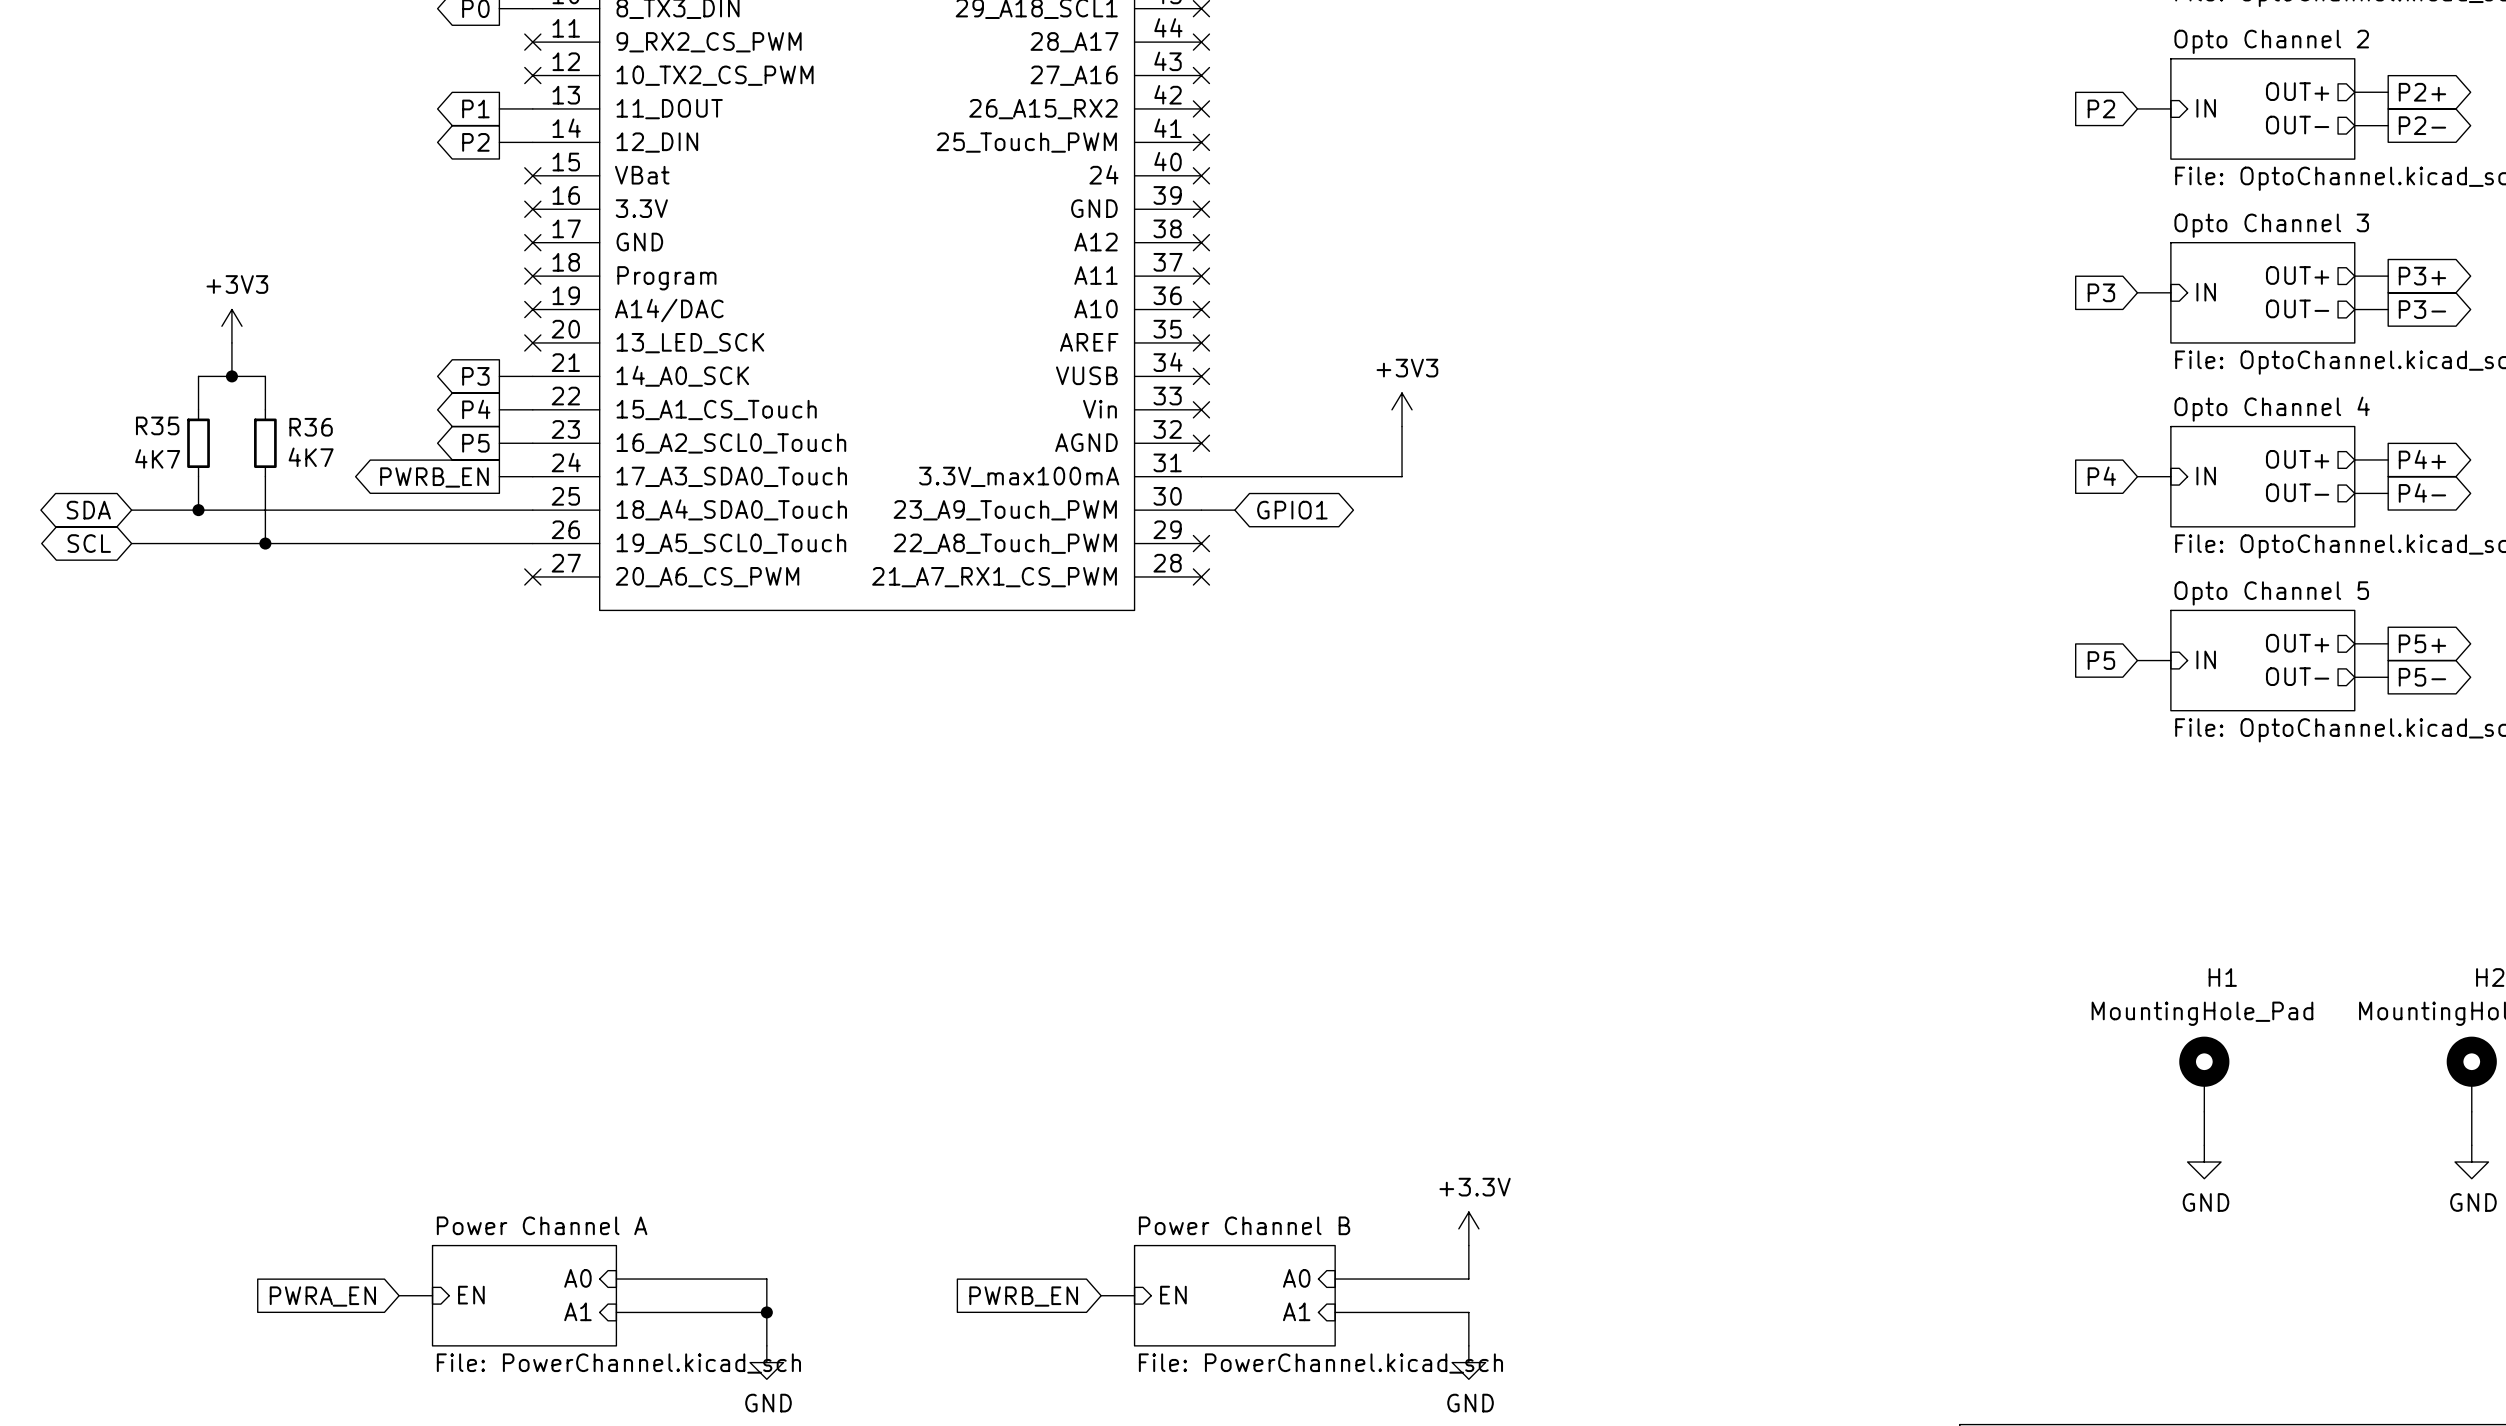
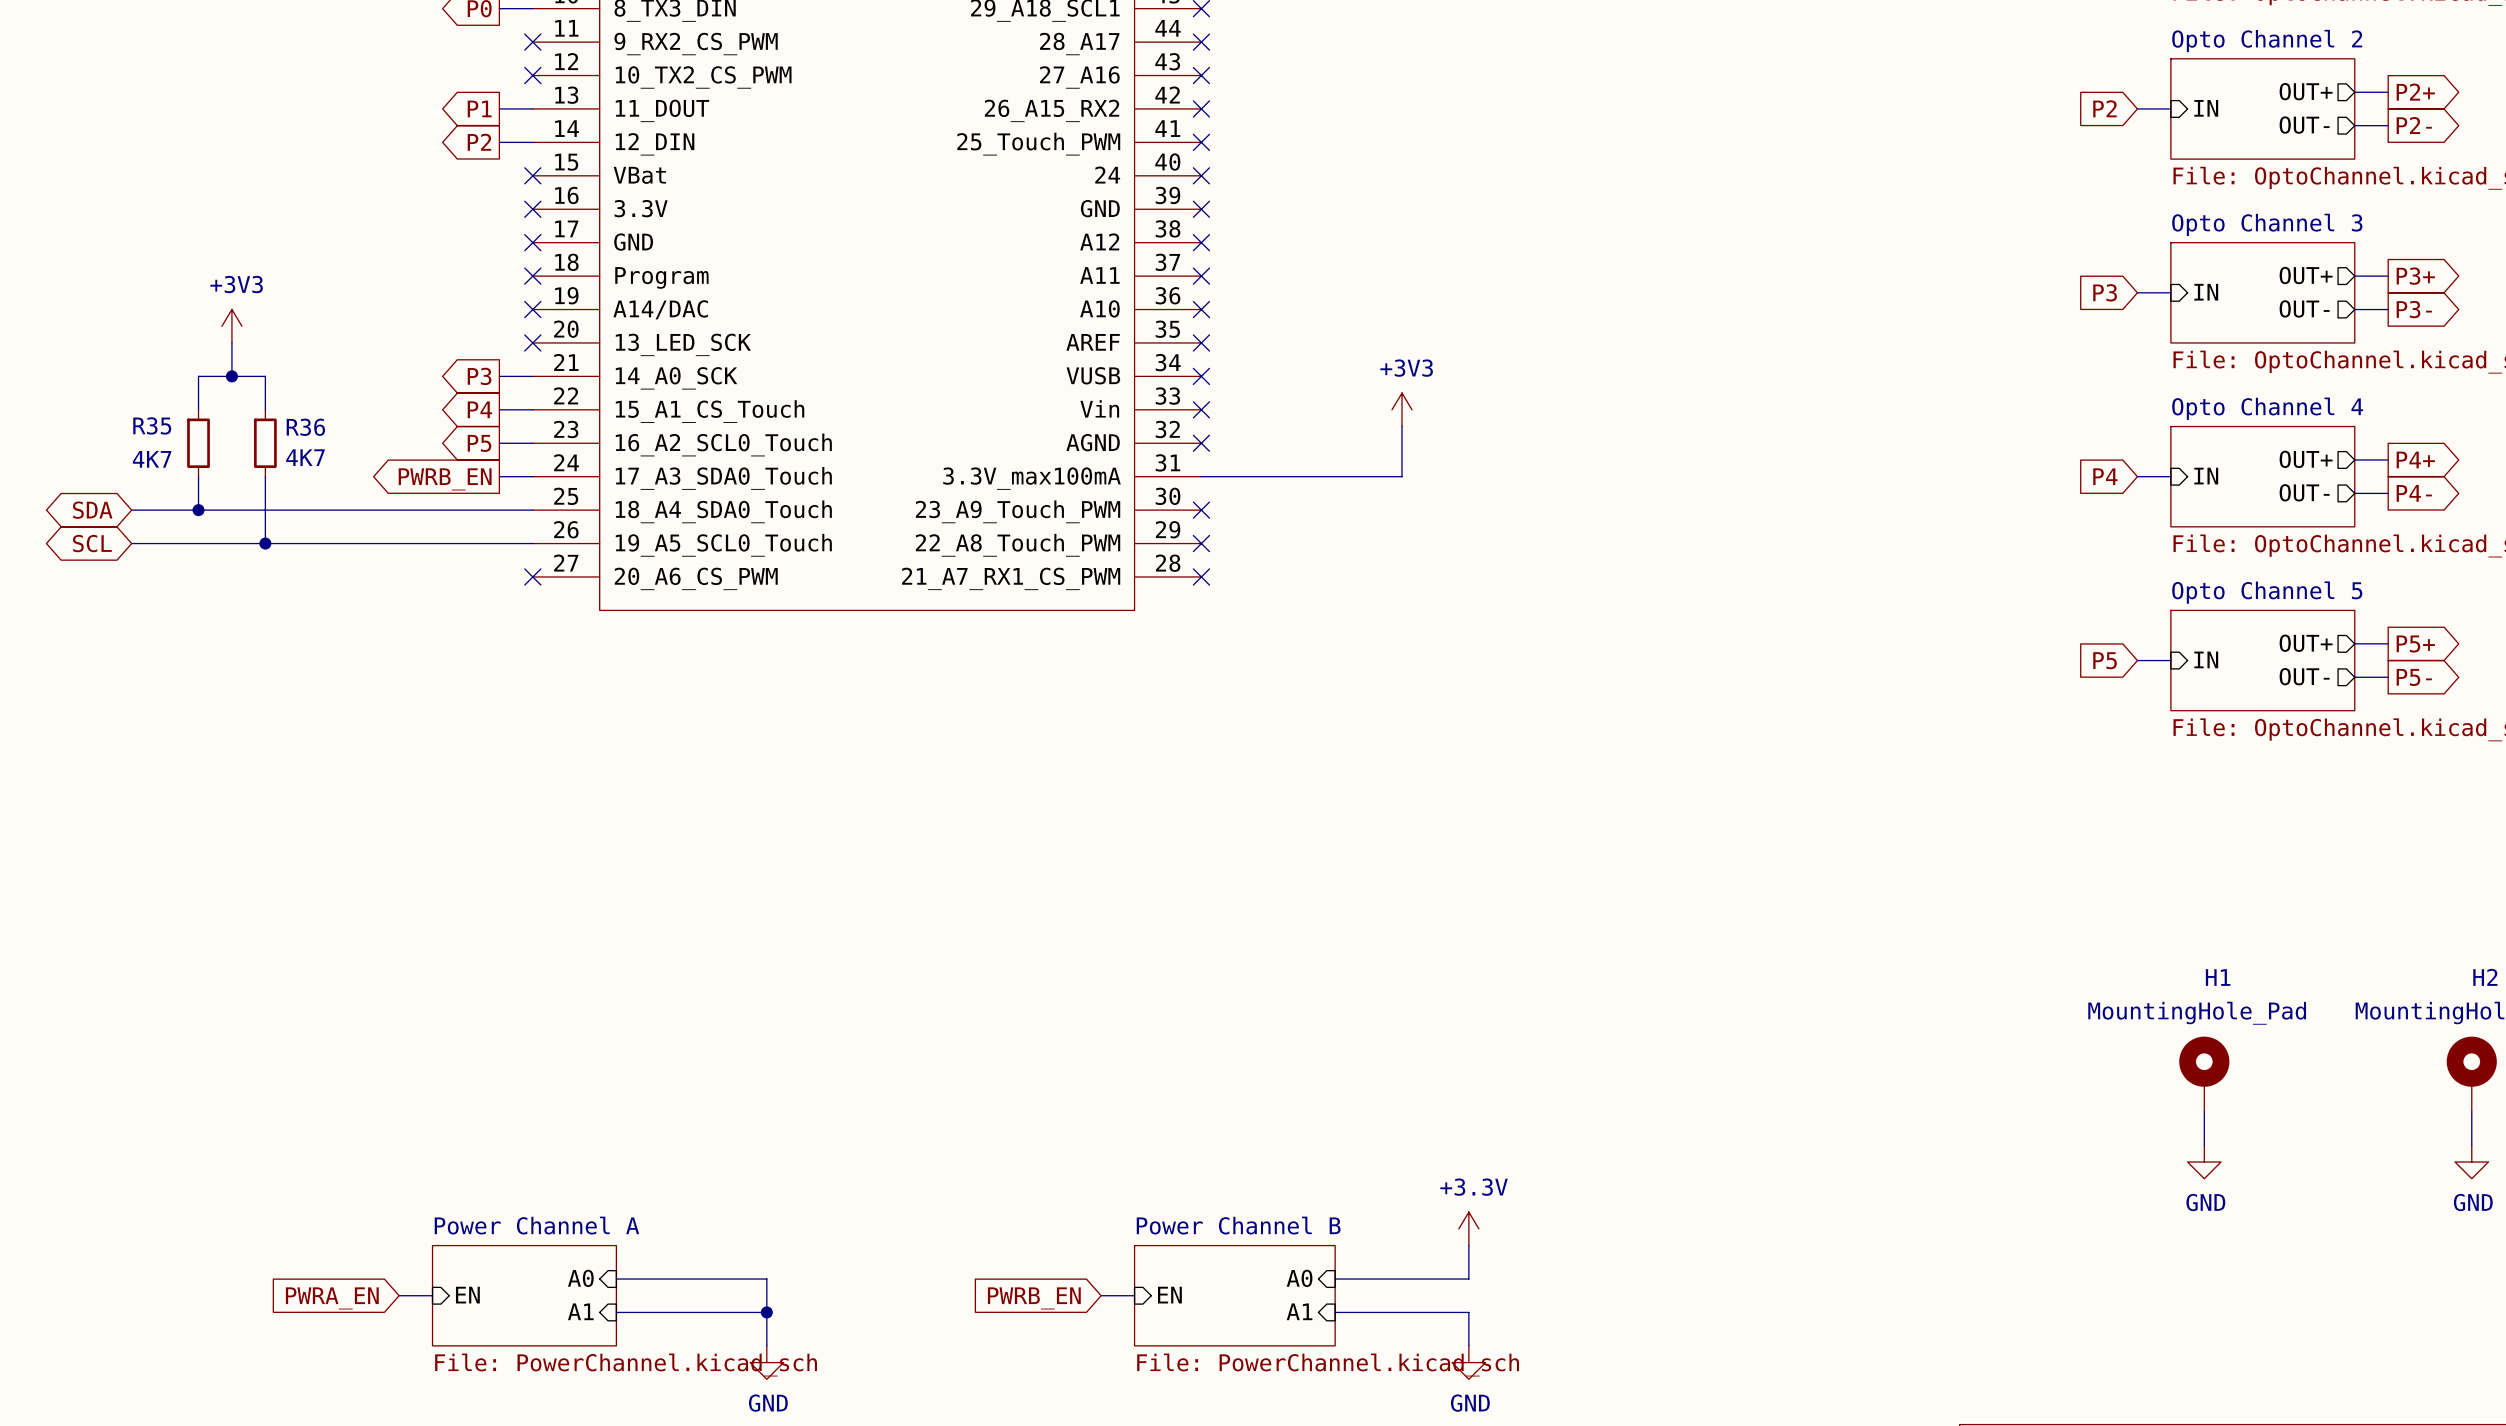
wire: (1201, 510) (1234, 510) -> none
no-connect mark: none -> (1201, 510)
global label: GPIO1 (1292, 510) -> none

